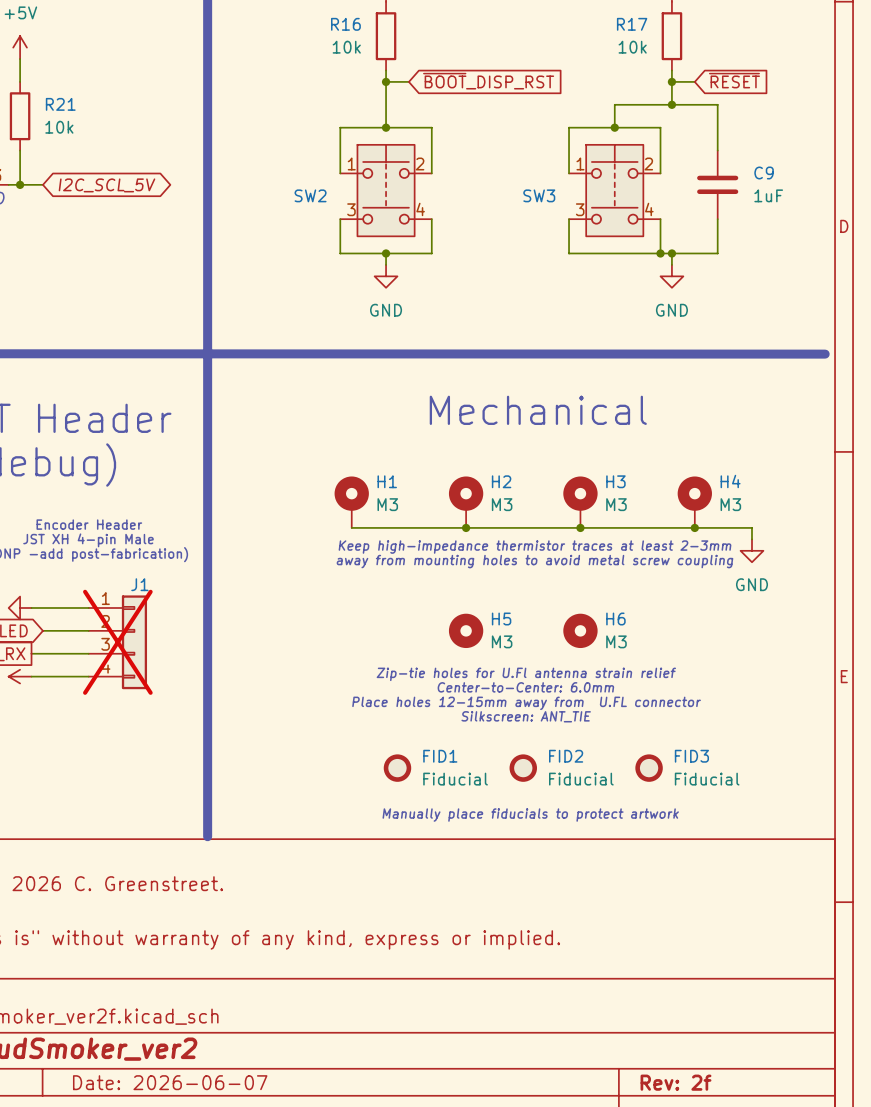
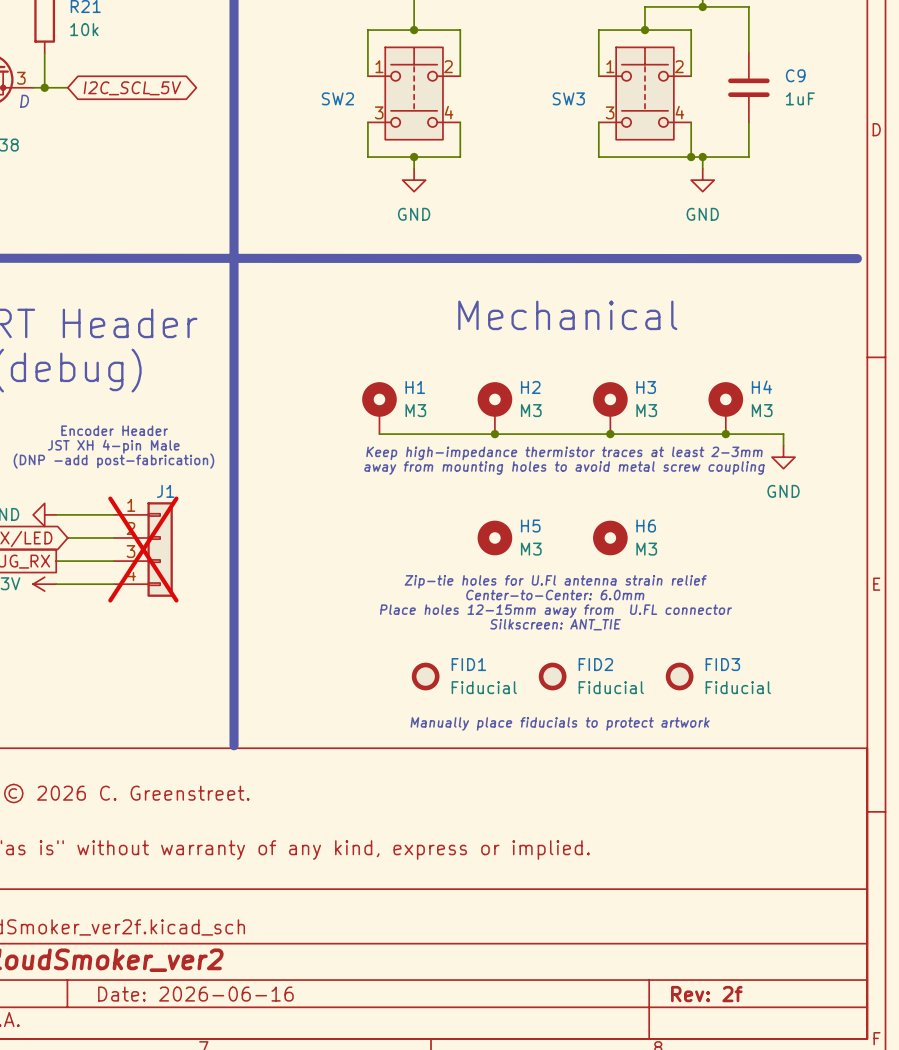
title block: Date: 2026-06-07 (170, 1082) -> Date: 2026-06-16 (195, 994)

